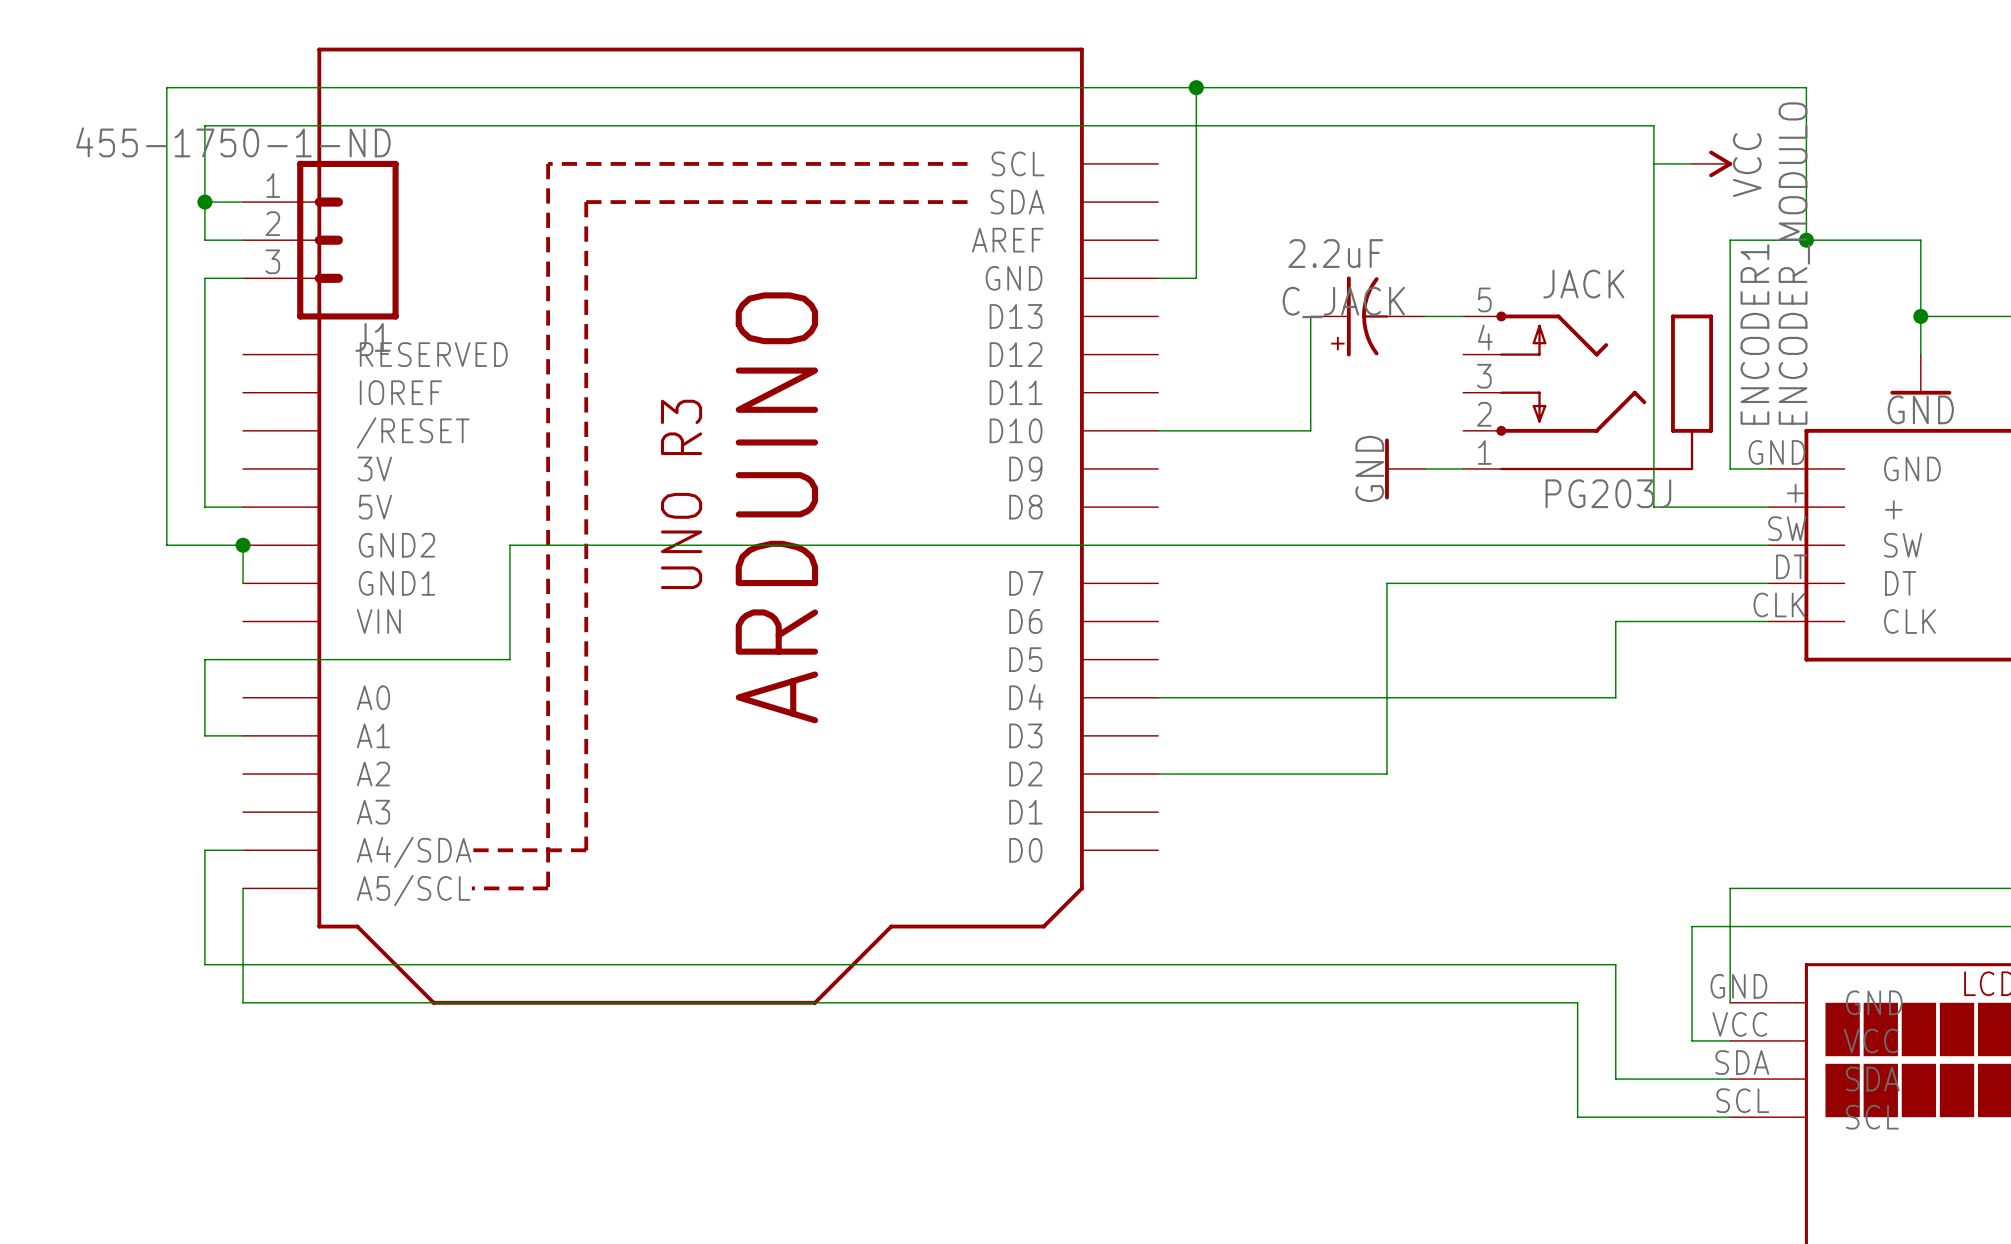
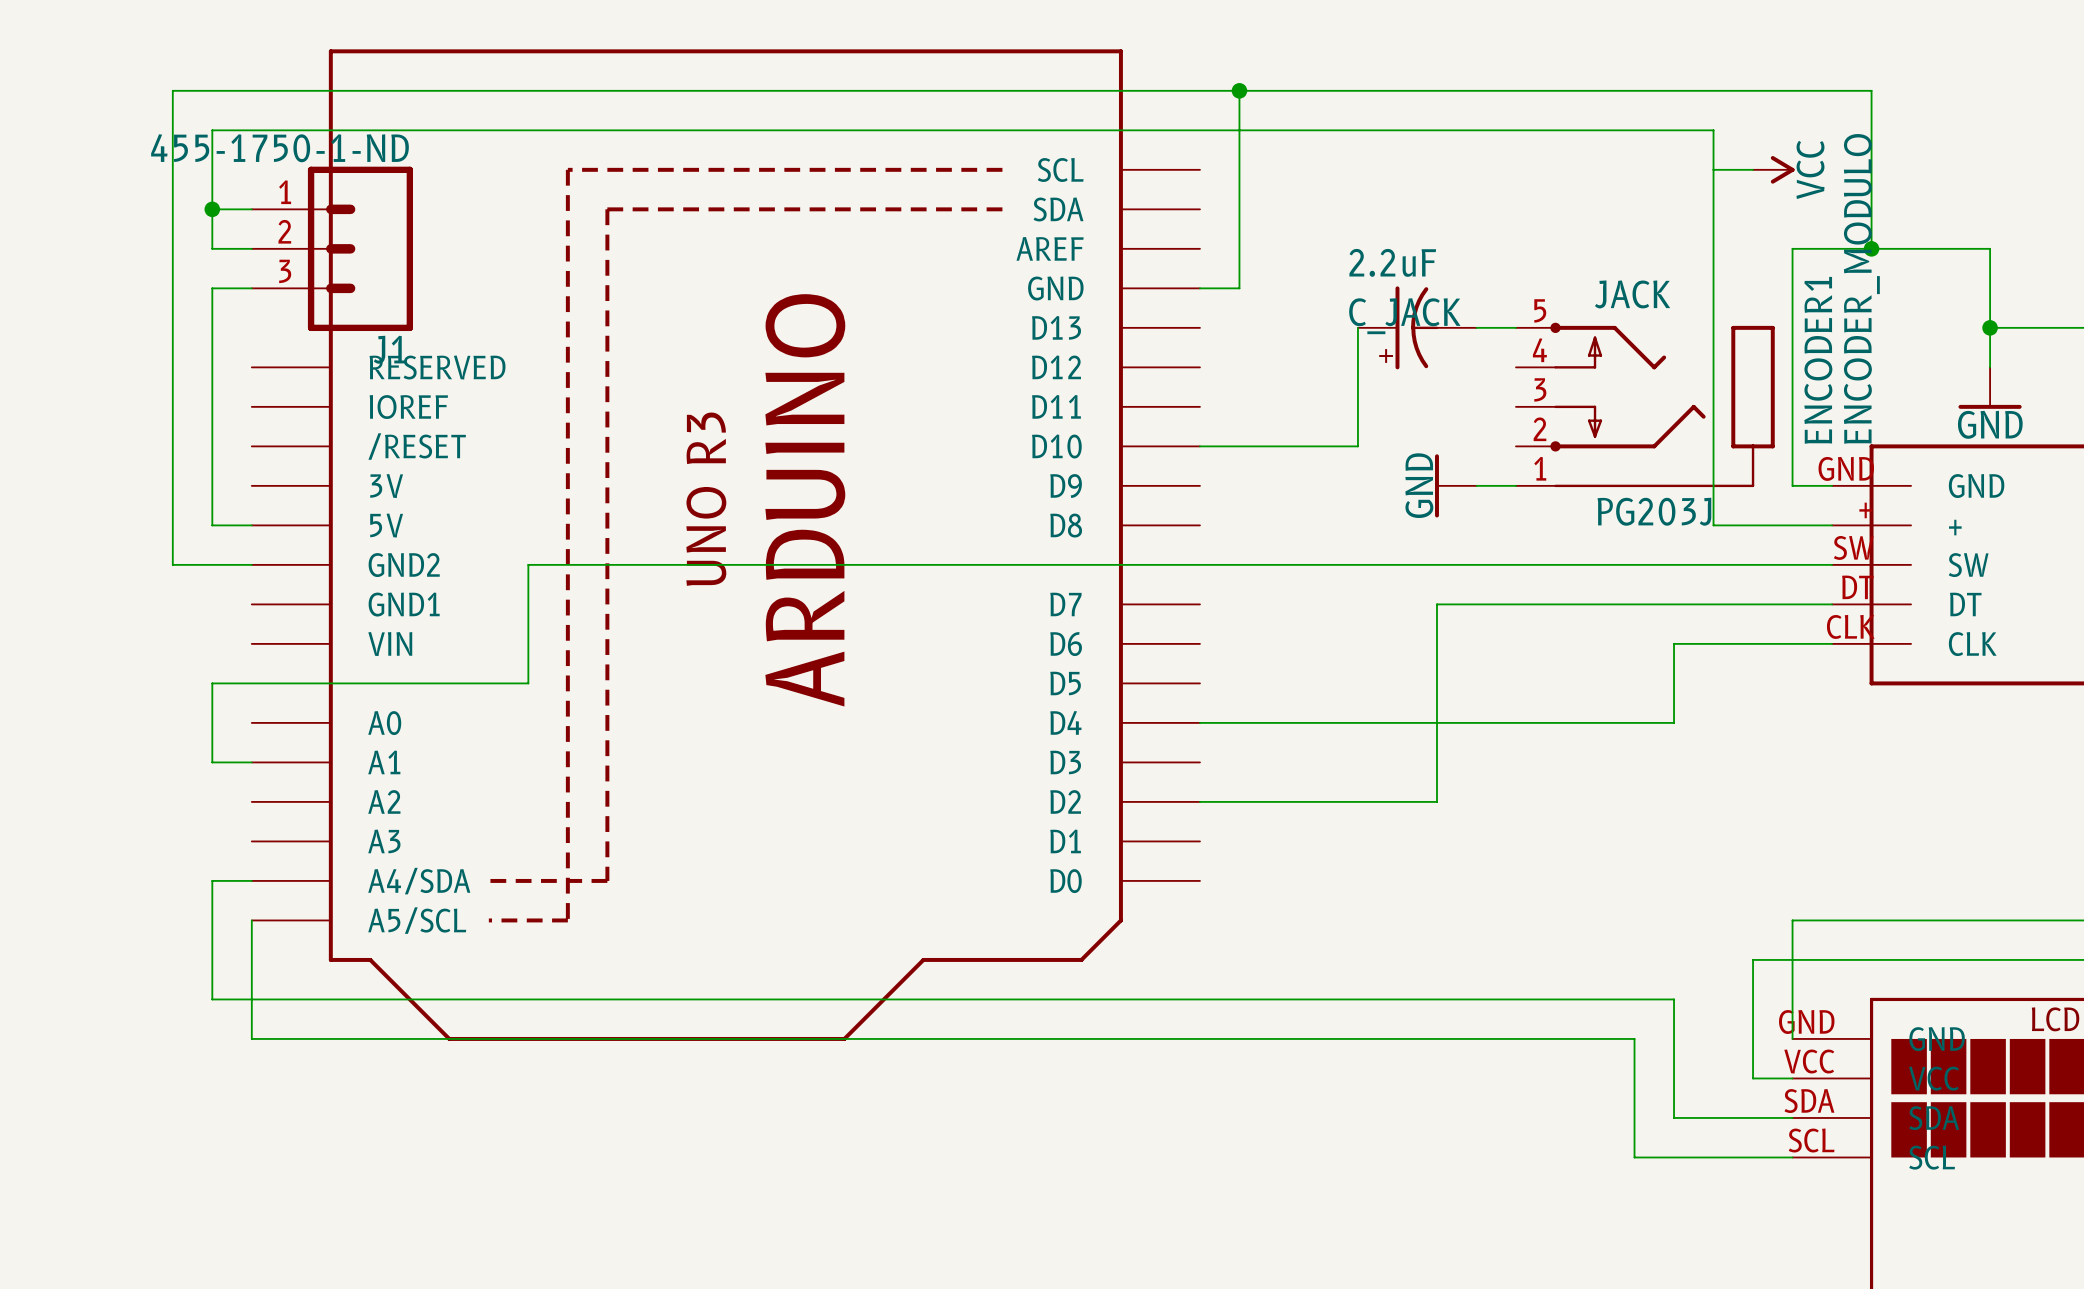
wire: (243, 545) (243, 583) -> none
junction: (243, 545) -> none

